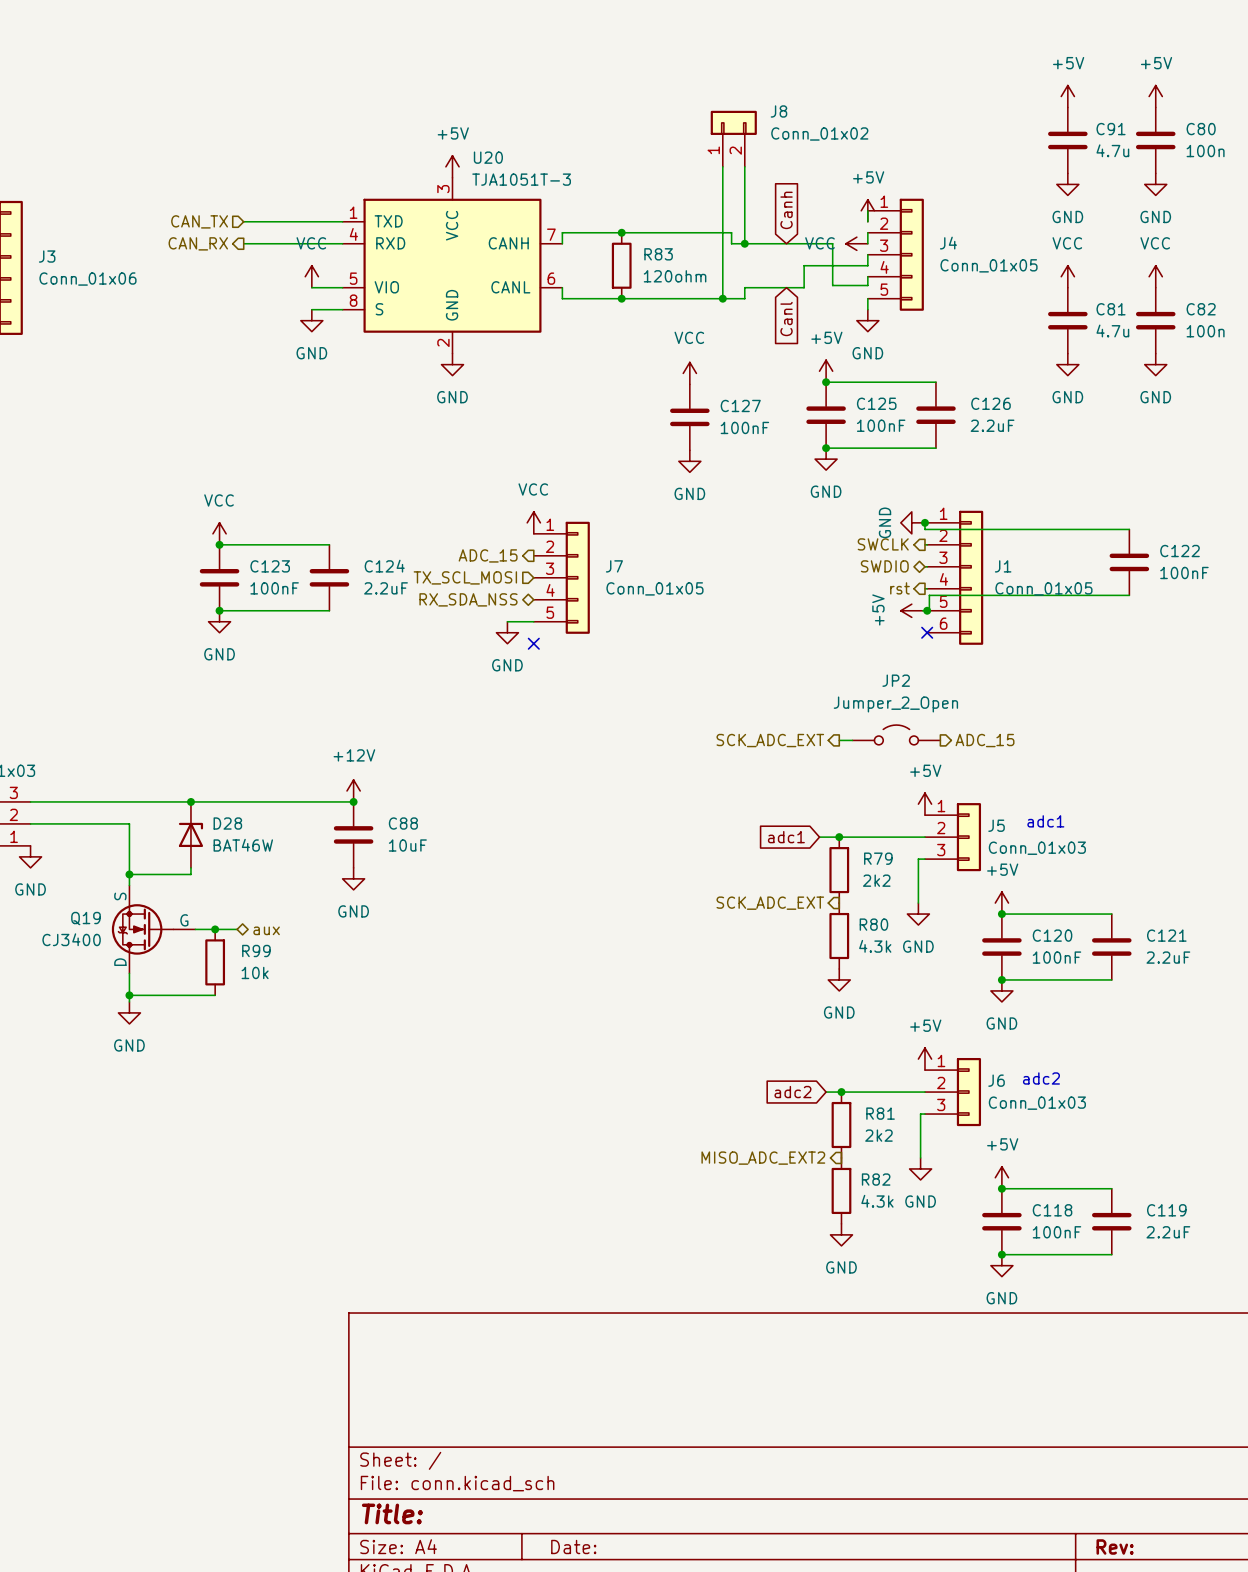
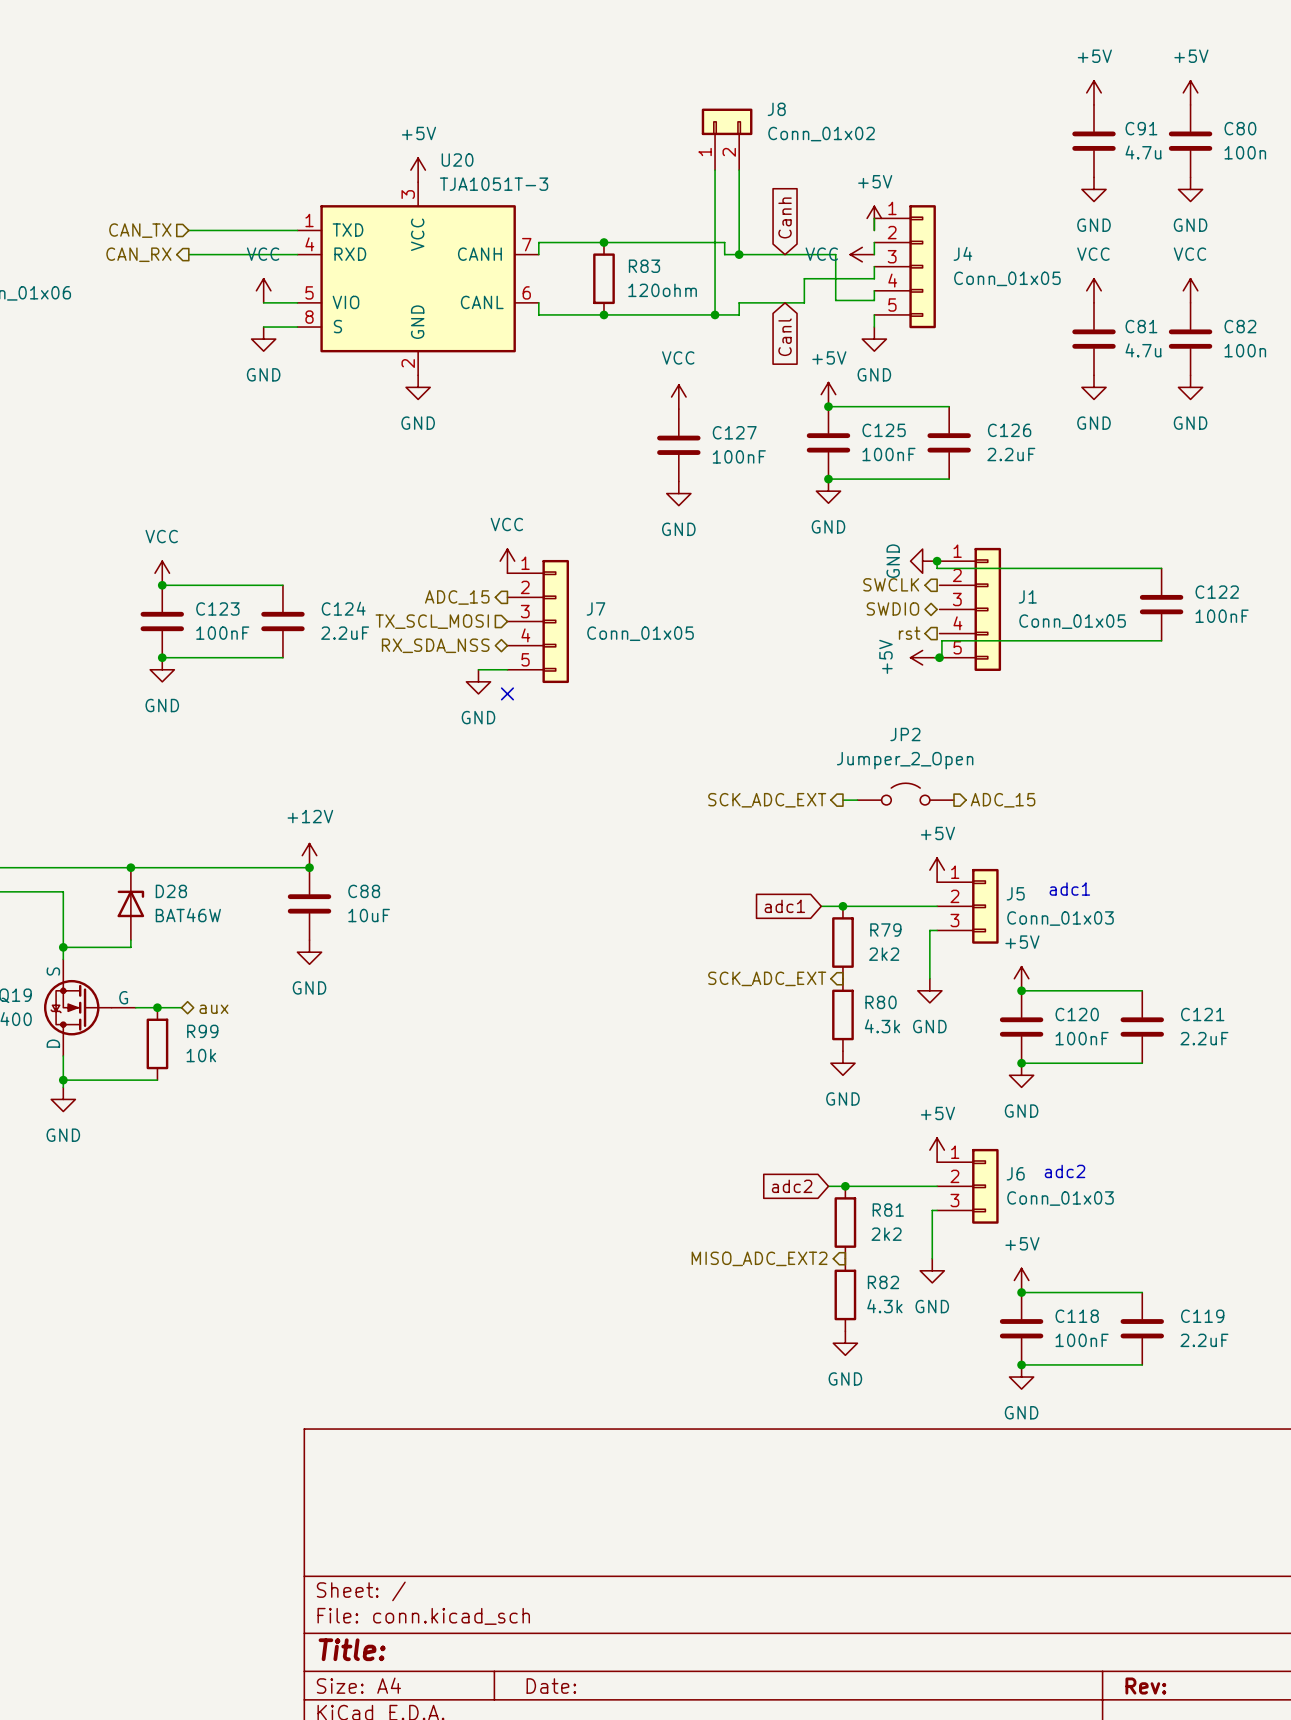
J1 symbol: [927, 510, 984, 645] -> [939, 547, 1002, 671]
no-connect mark: (927, 632) -> none

